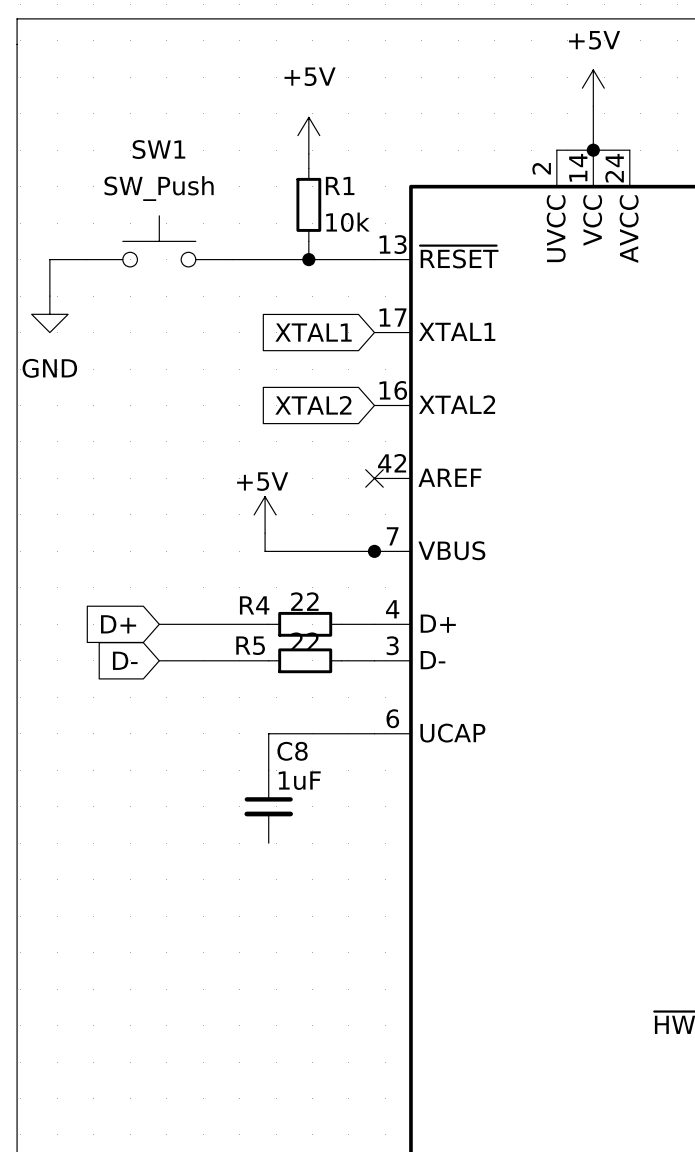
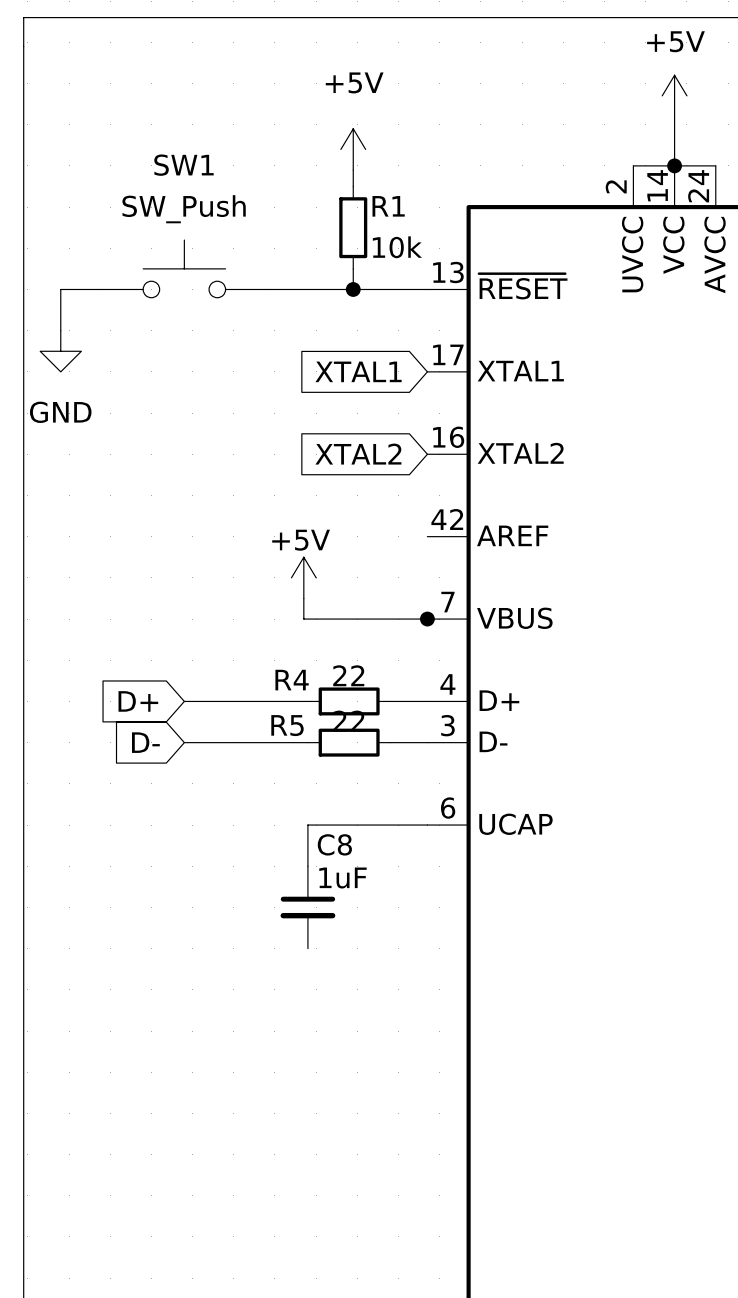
no-connect mark: (374, 478) -> none

